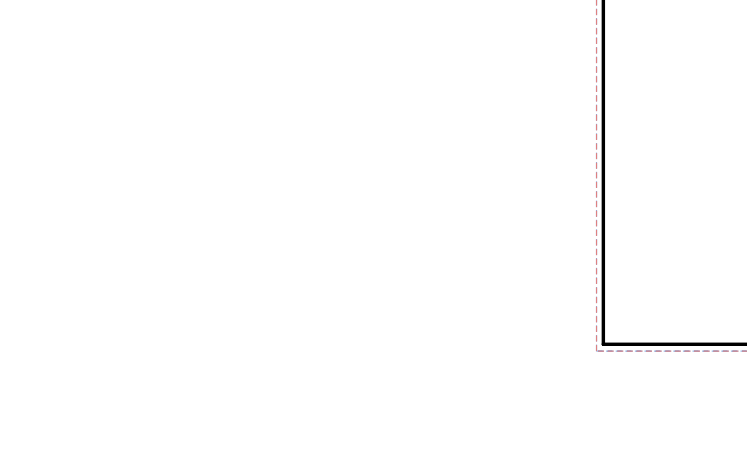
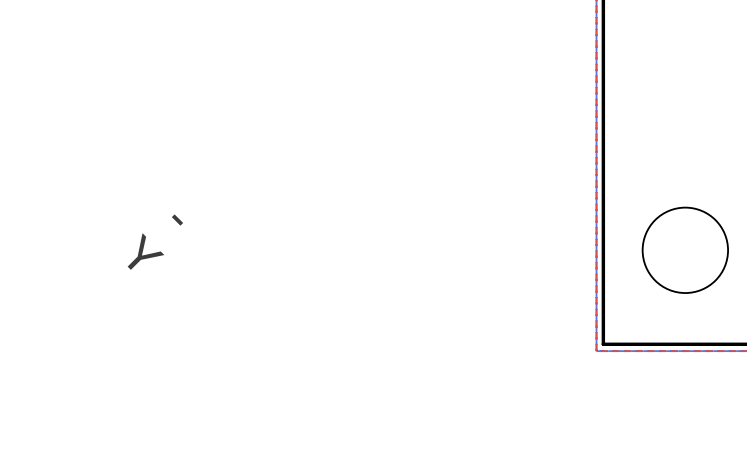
round board edge: none -> [641, 206, 729, 294]
text: none -> - (177, 220)
text: none -> Y (146, 251)

